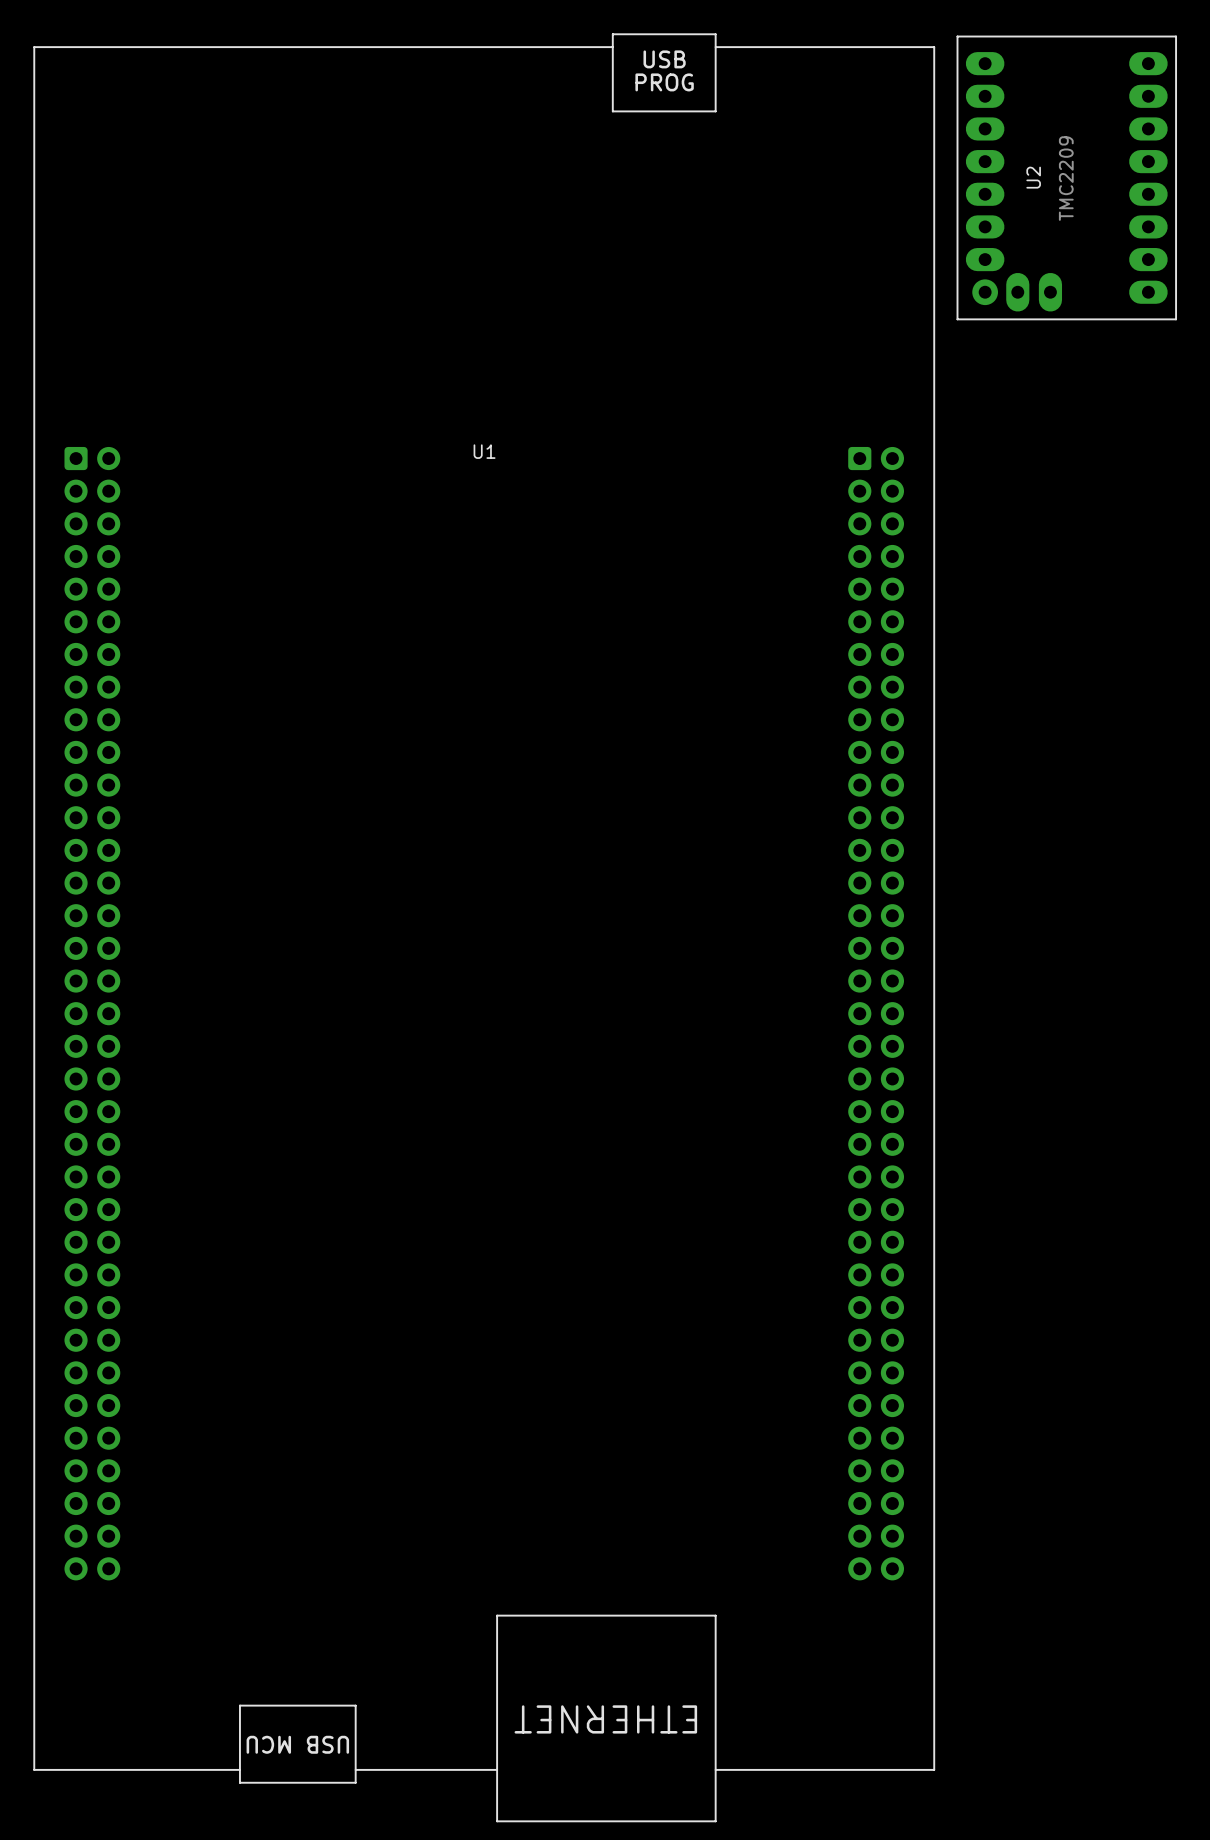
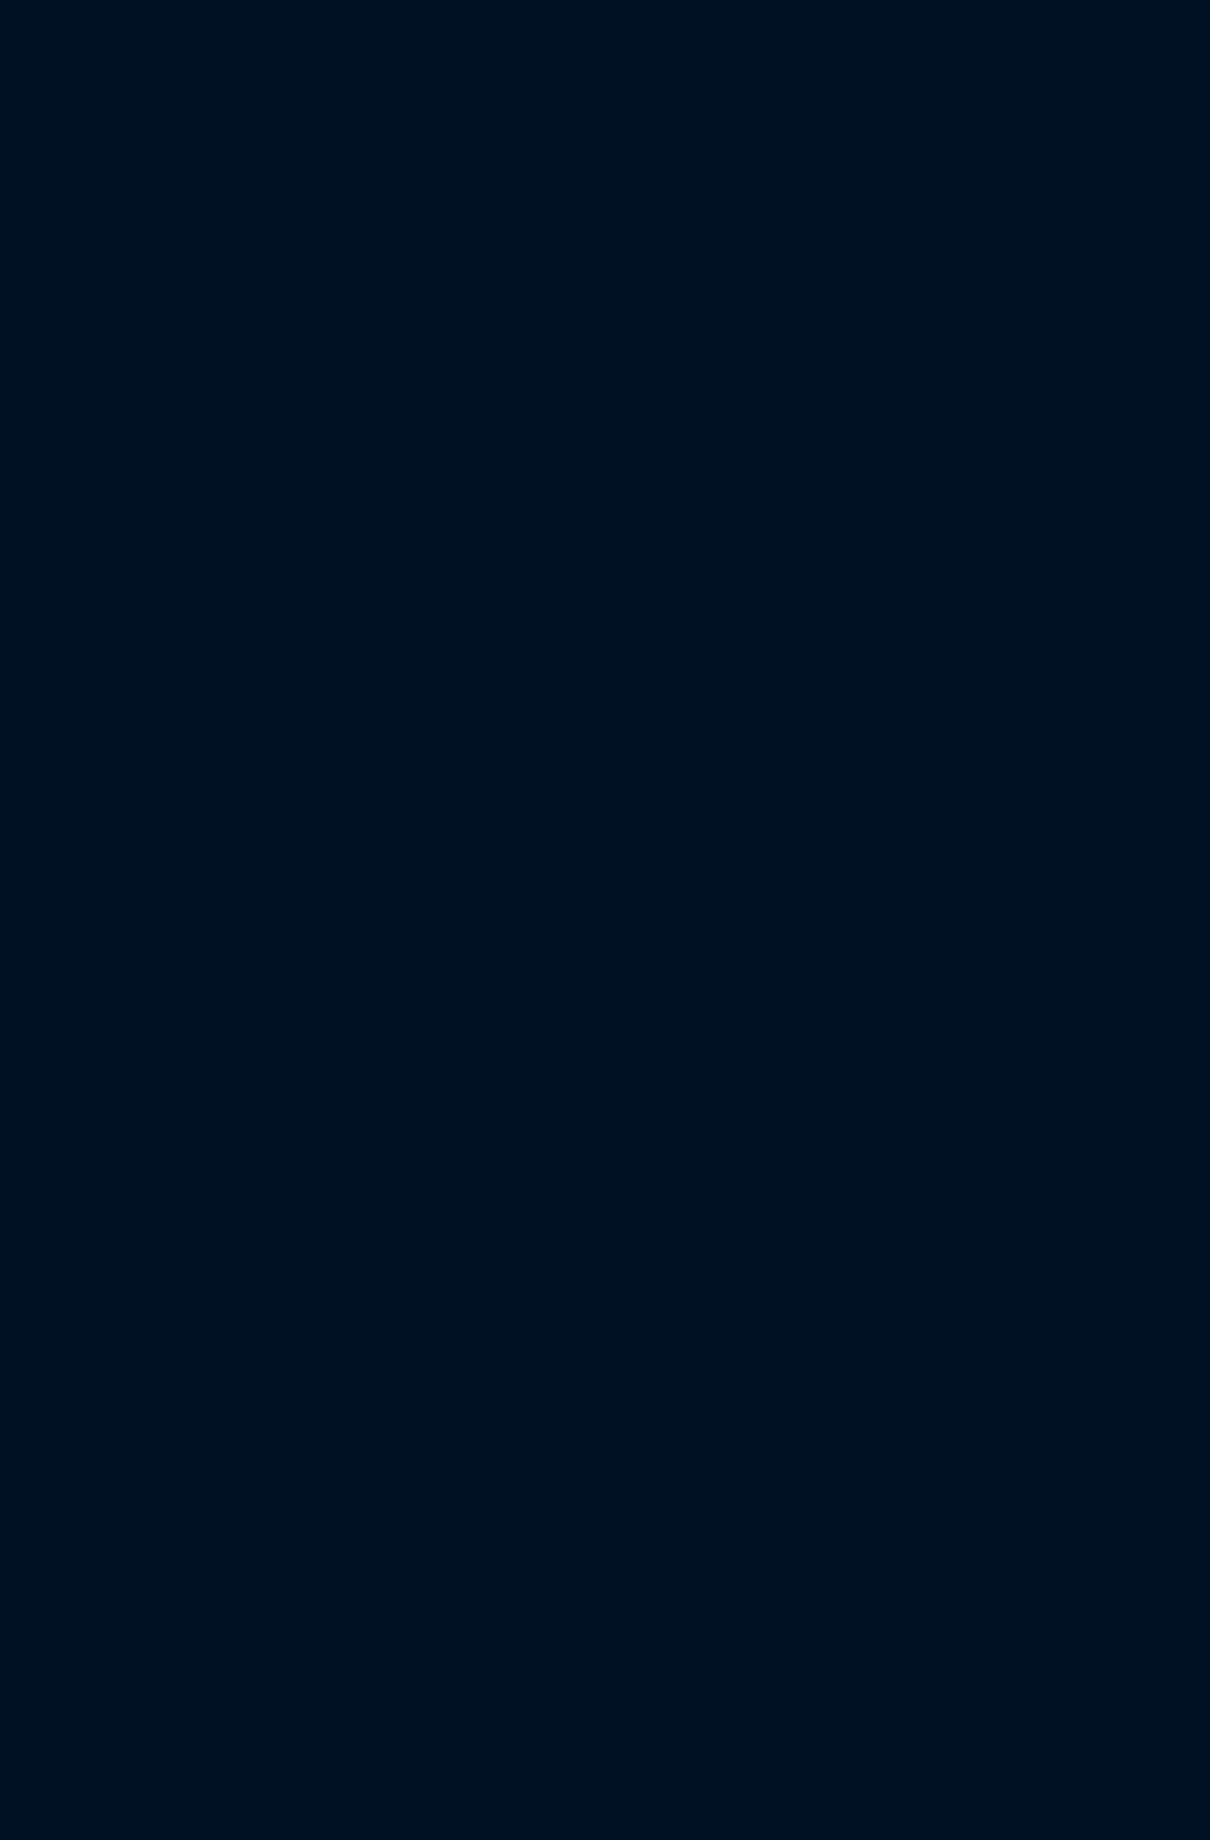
U2: TMC2209 (1066, 177) -> none
U1: (484, 927) -> none

